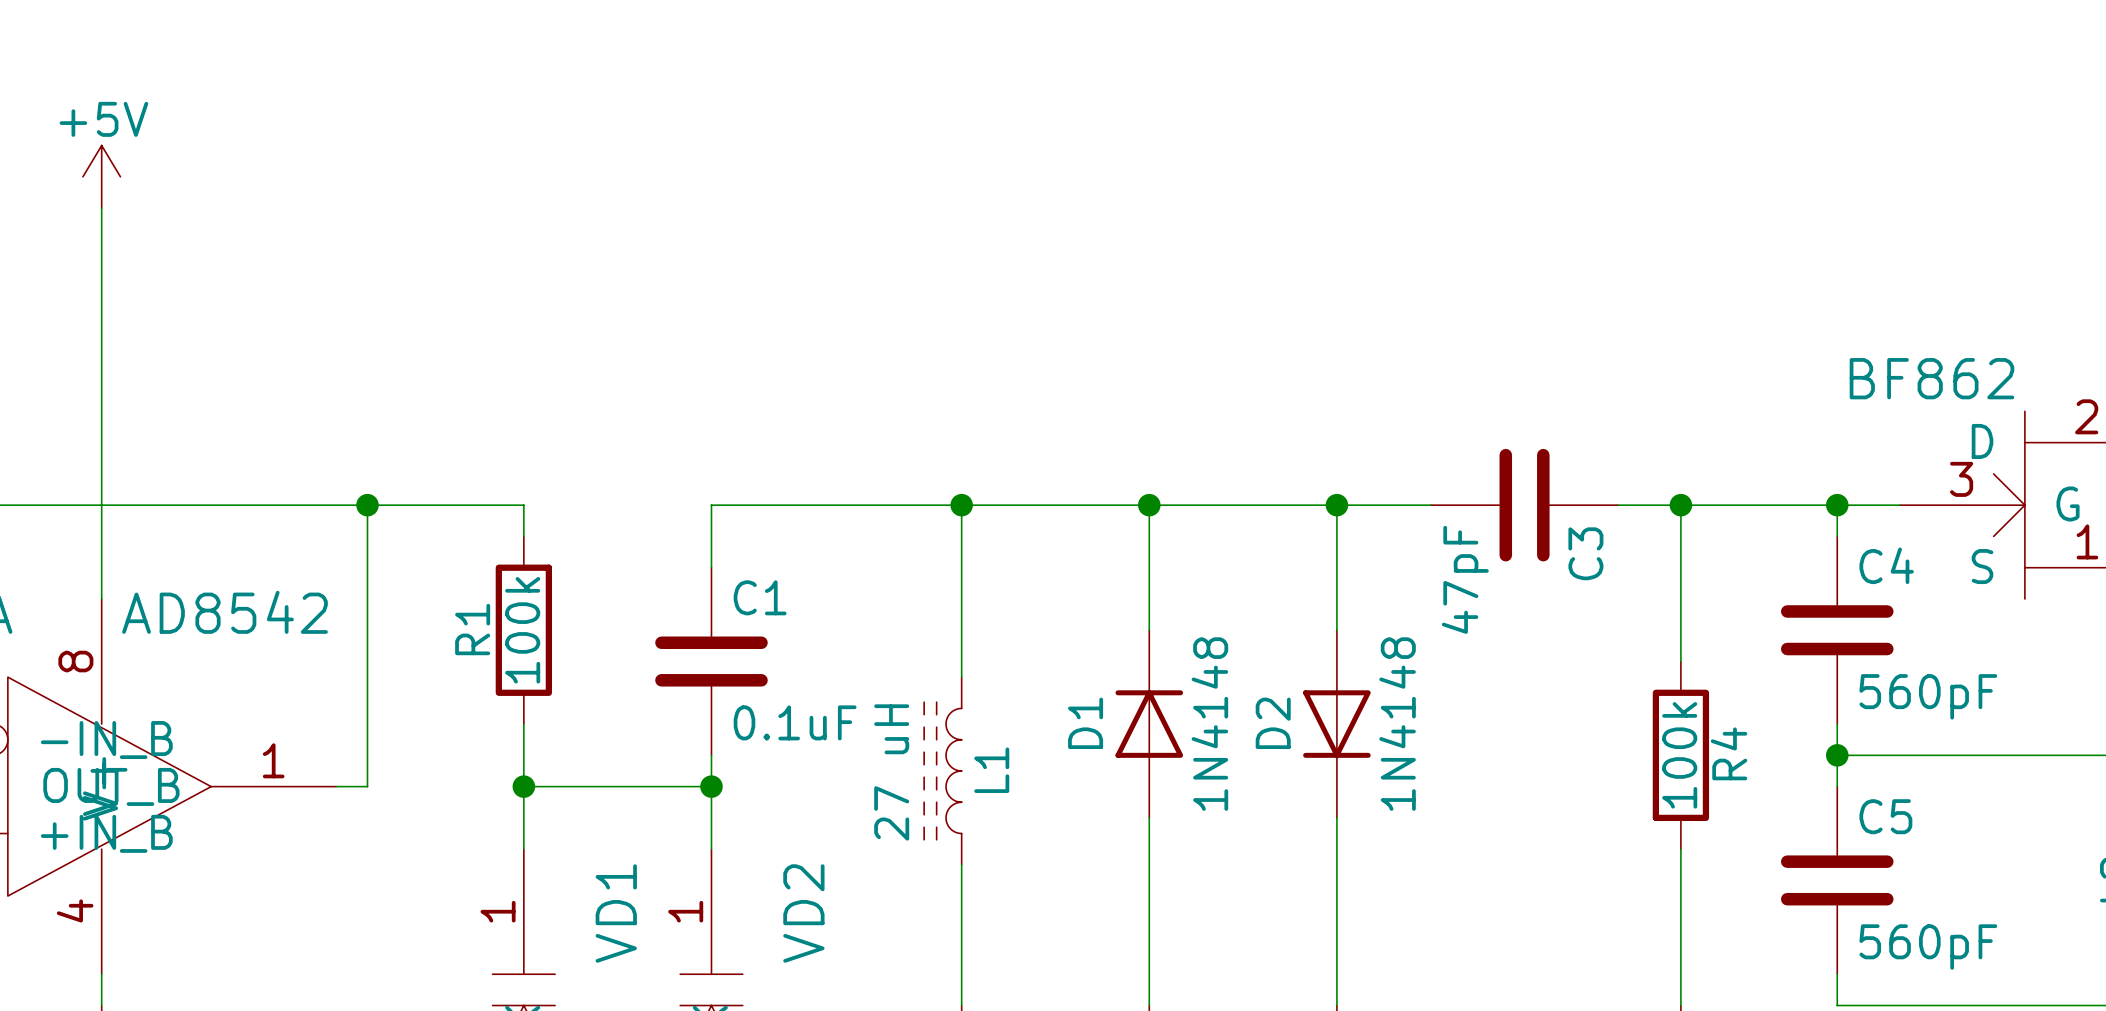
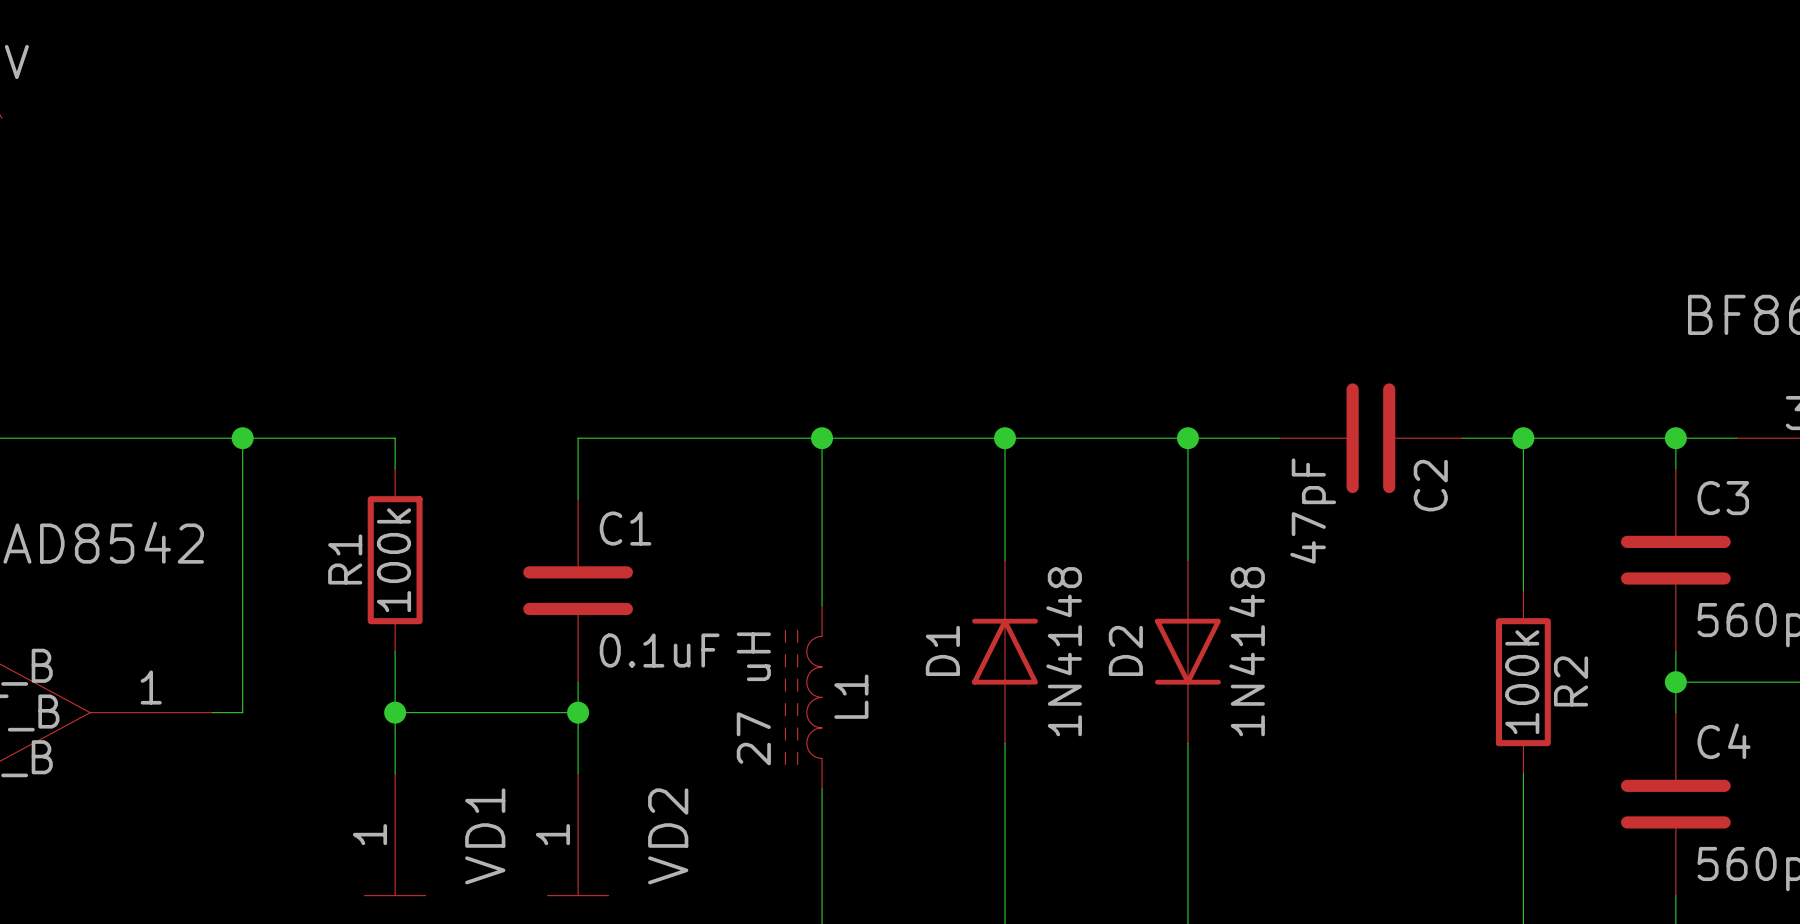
C3 name: C3 (1585, 553) -> C2 (1430, 485)
C4 name: C4 (1886, 565) -> C3 (1723, 498)
R4 name: R4 (1729, 753) -> R2 (1571, 681)
C5 name: C5 (1885, 816) -> C4 (1724, 741)

